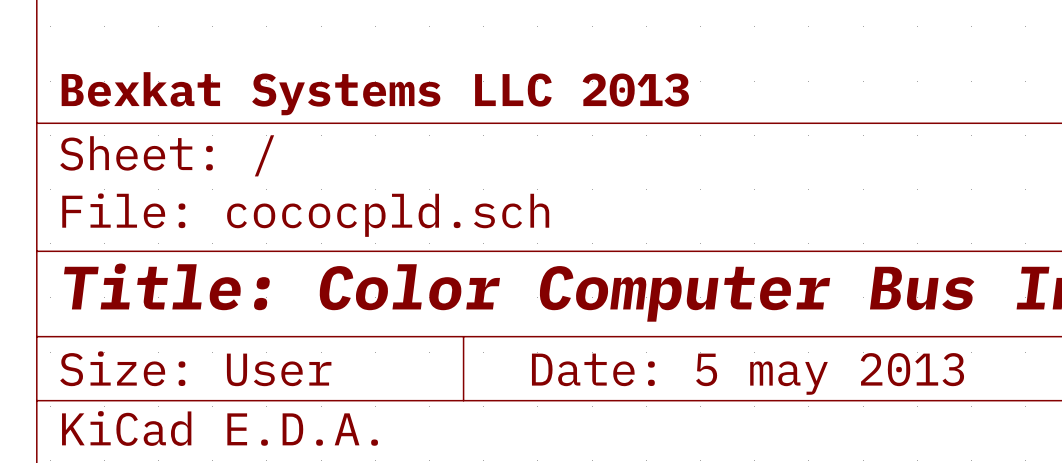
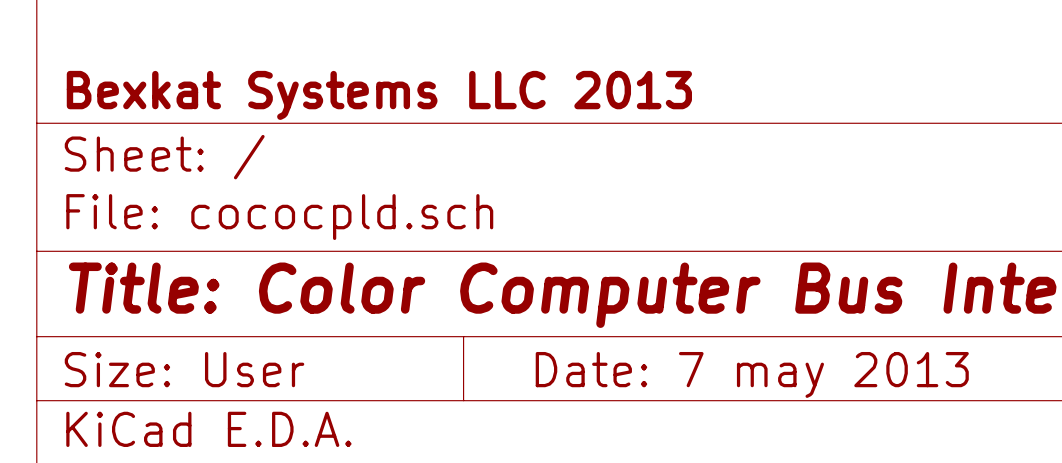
title block: Date: 5 may 2013 (748, 373) -> Date: 7 may 2013 (752, 374)

